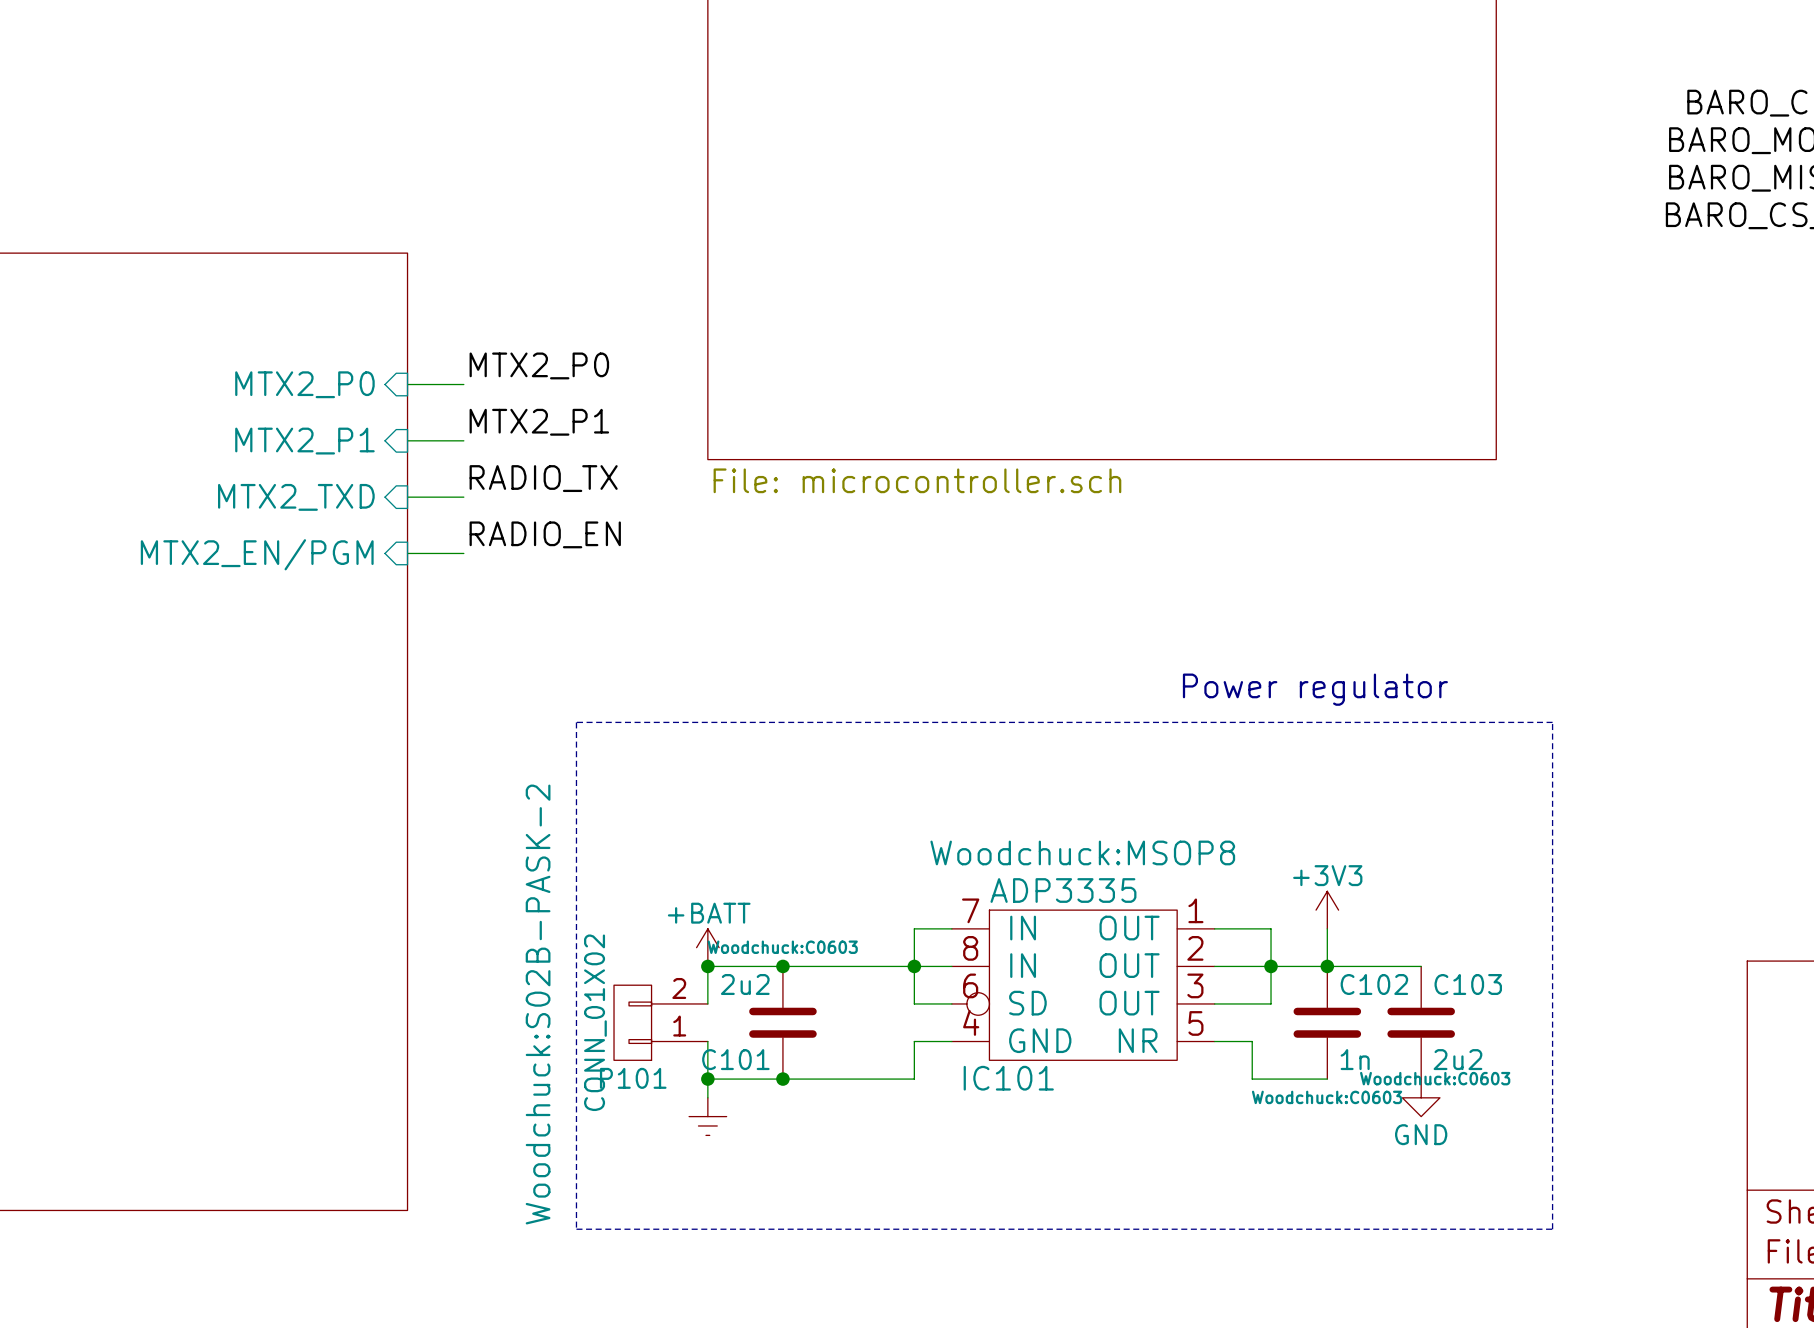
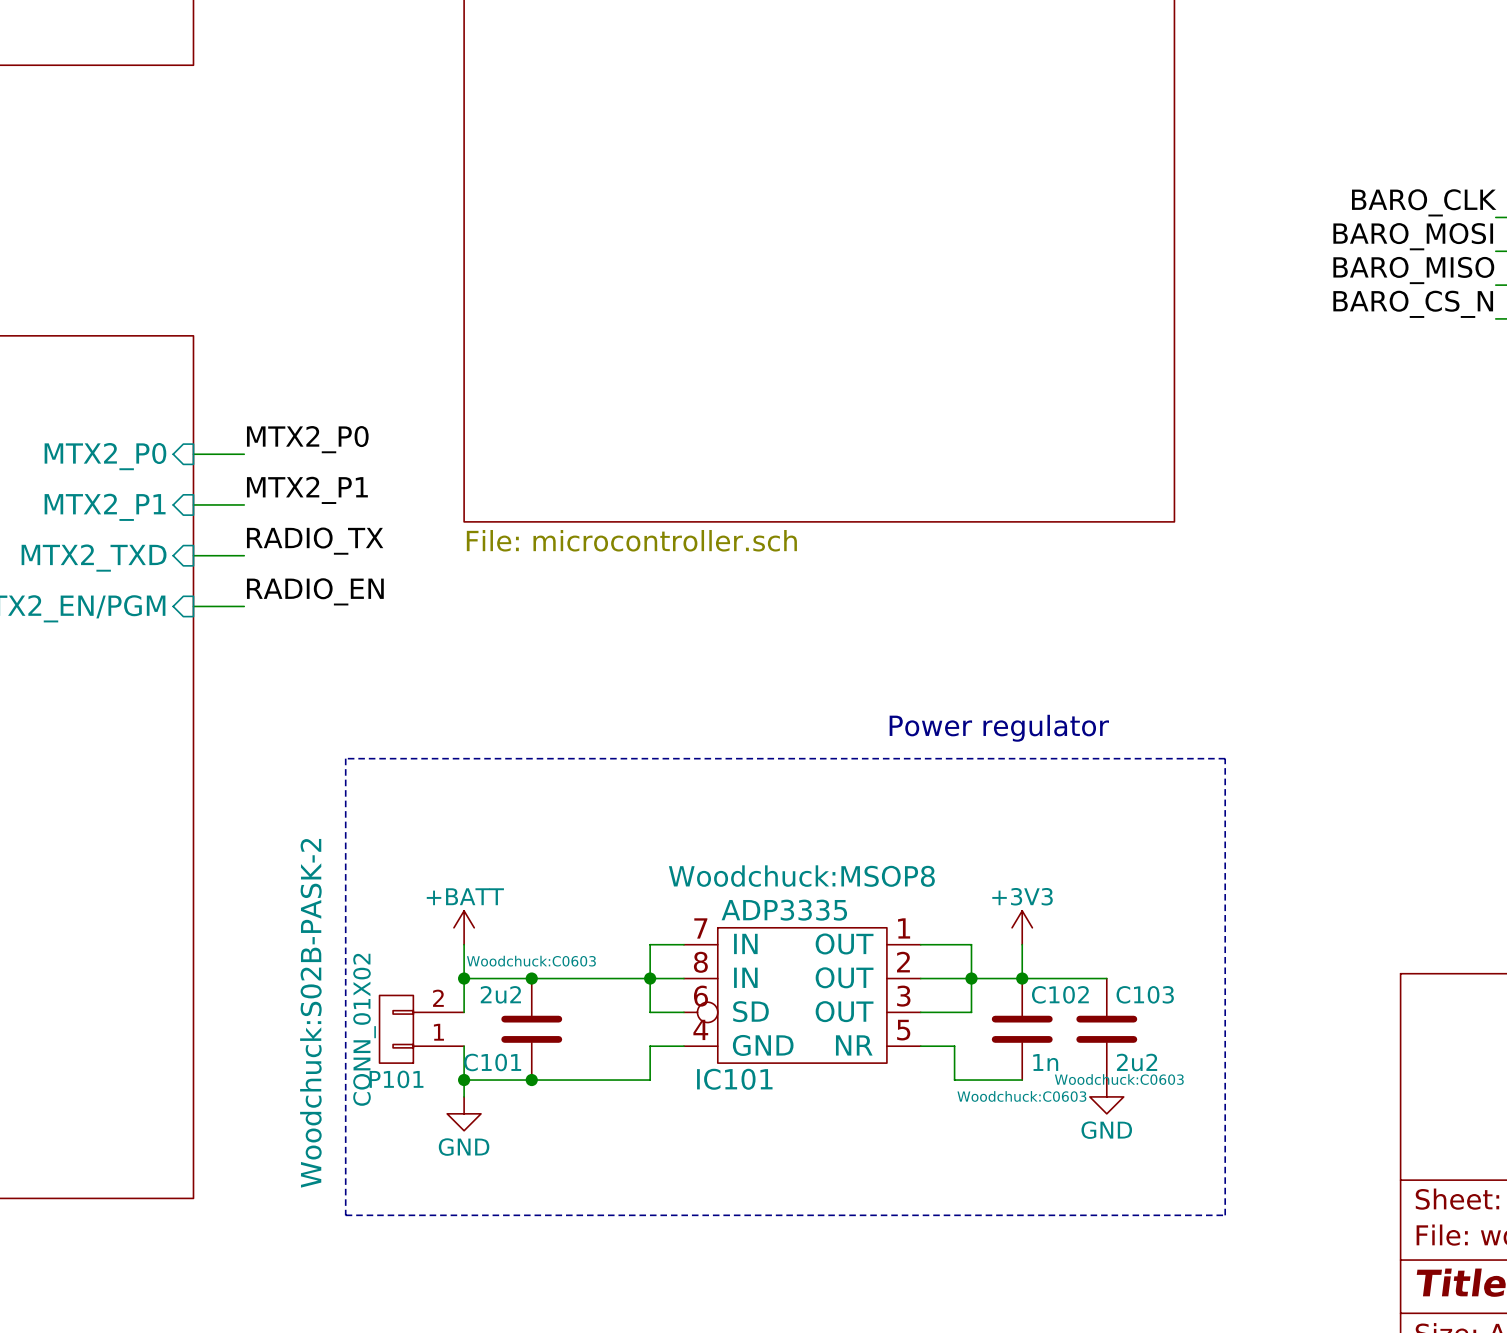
power symbol position: +BATT (707, 947) -> +BATT (464, 927)
power symbol shape: [689, 1097, 727, 1136] -> [447, 1096, 482, 1131]
power symbol text: none -> GND (464, 1147)

